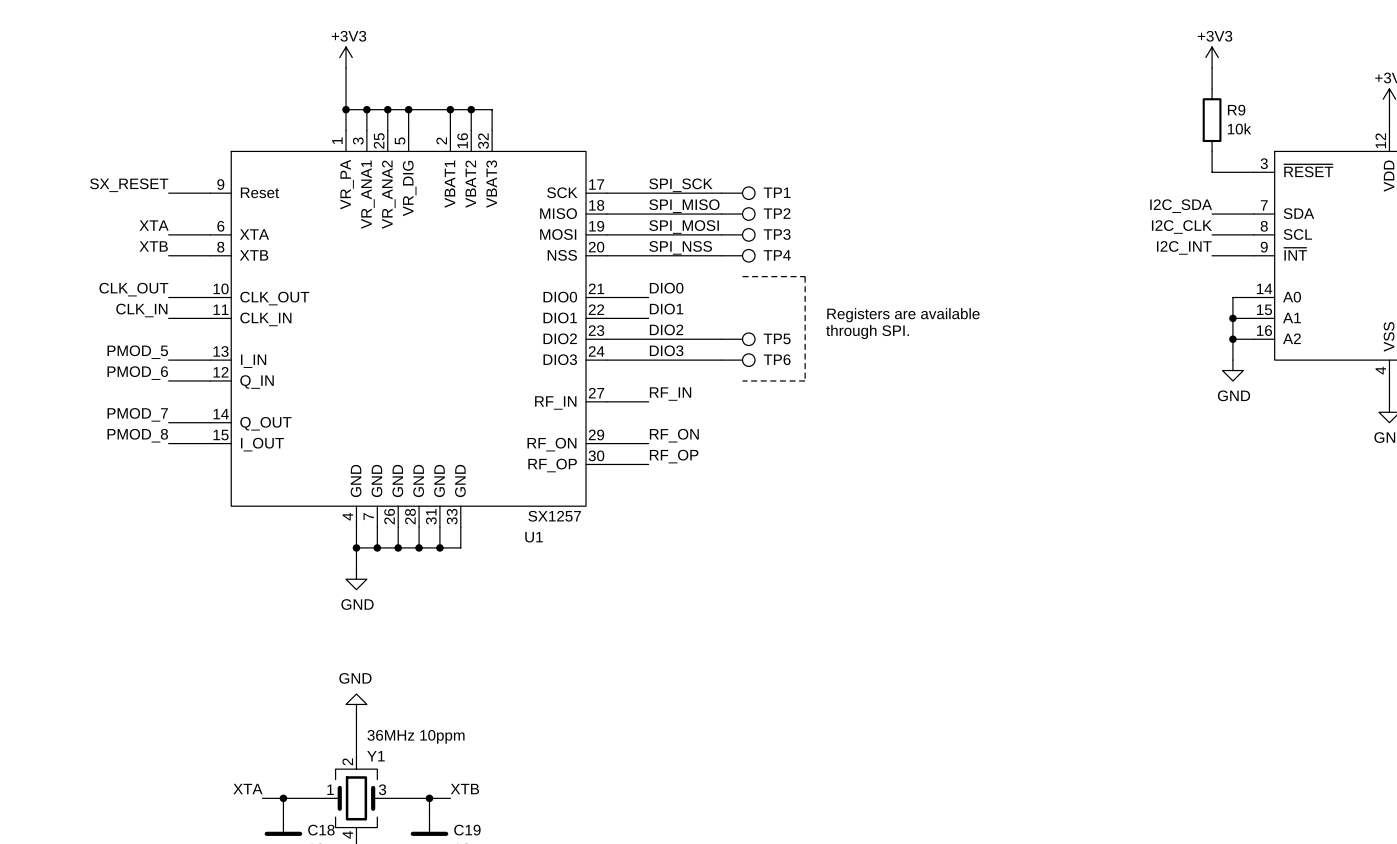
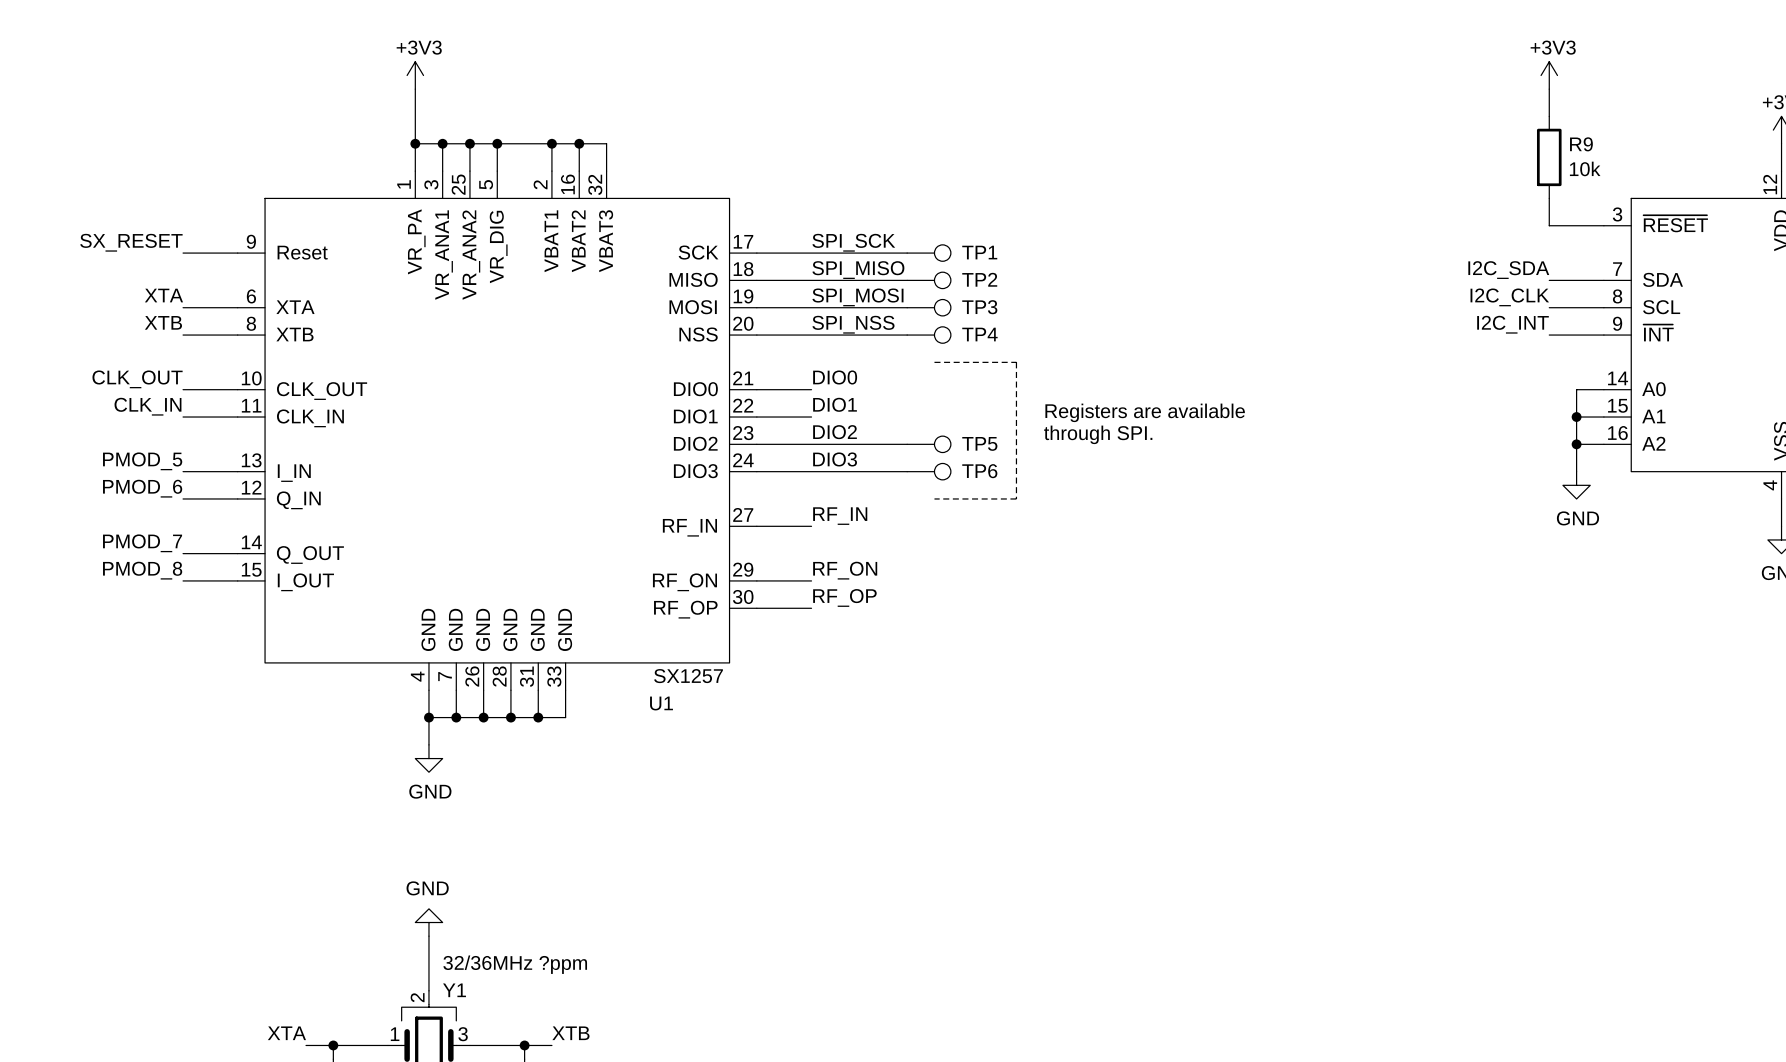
Y1 value: 36MHz 10ppm (415, 736) -> 32/36MHz ?ppm (515, 964)

